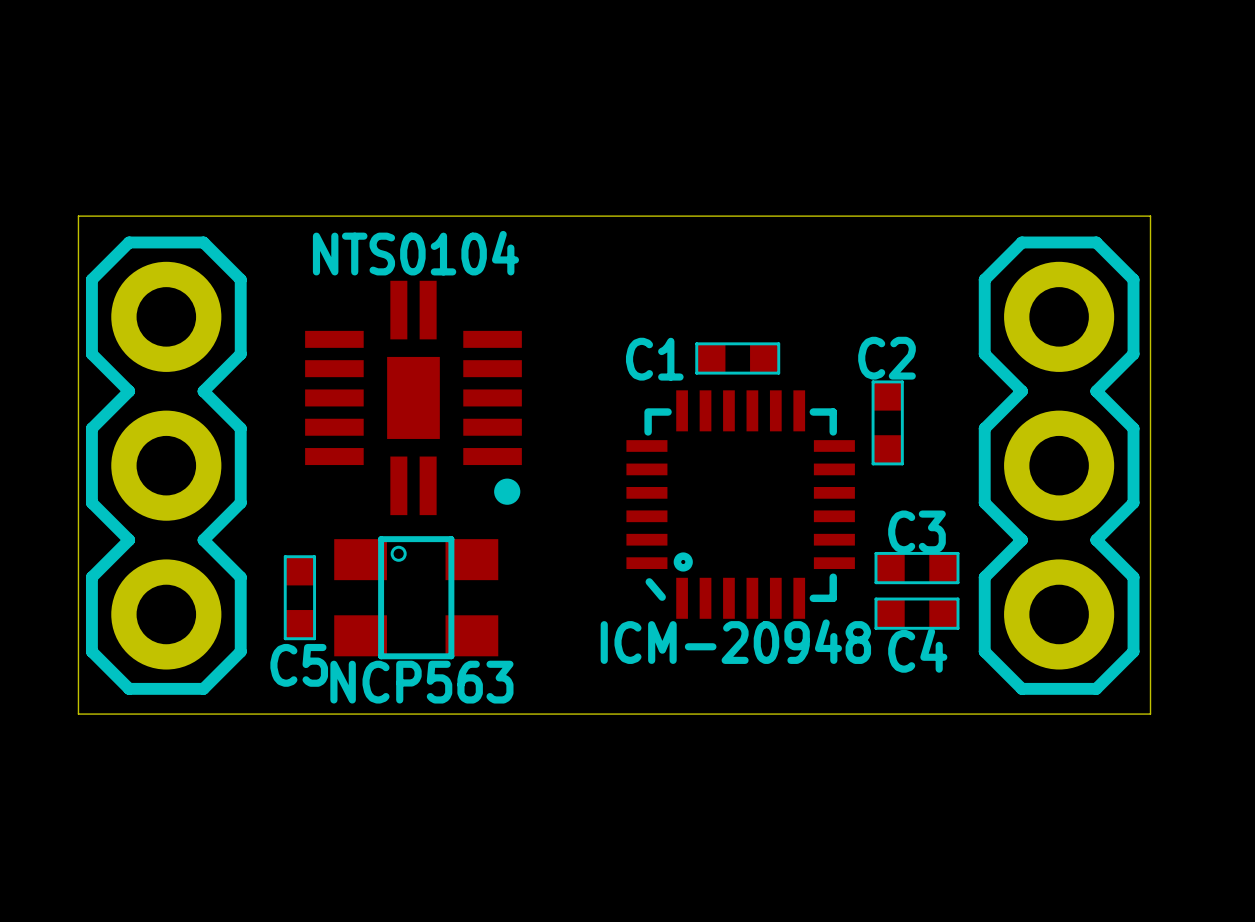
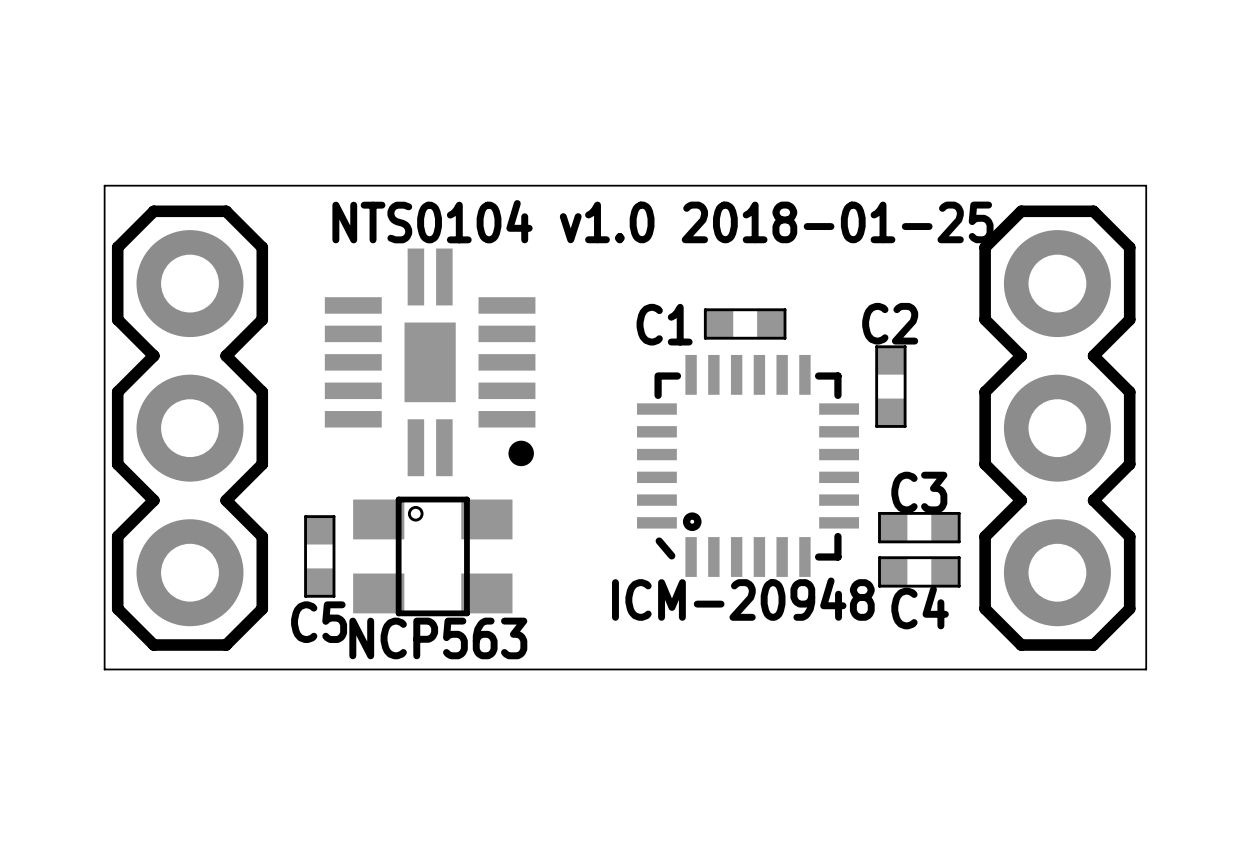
text: none -> v1.0 2018-01-25 (776, 222)

